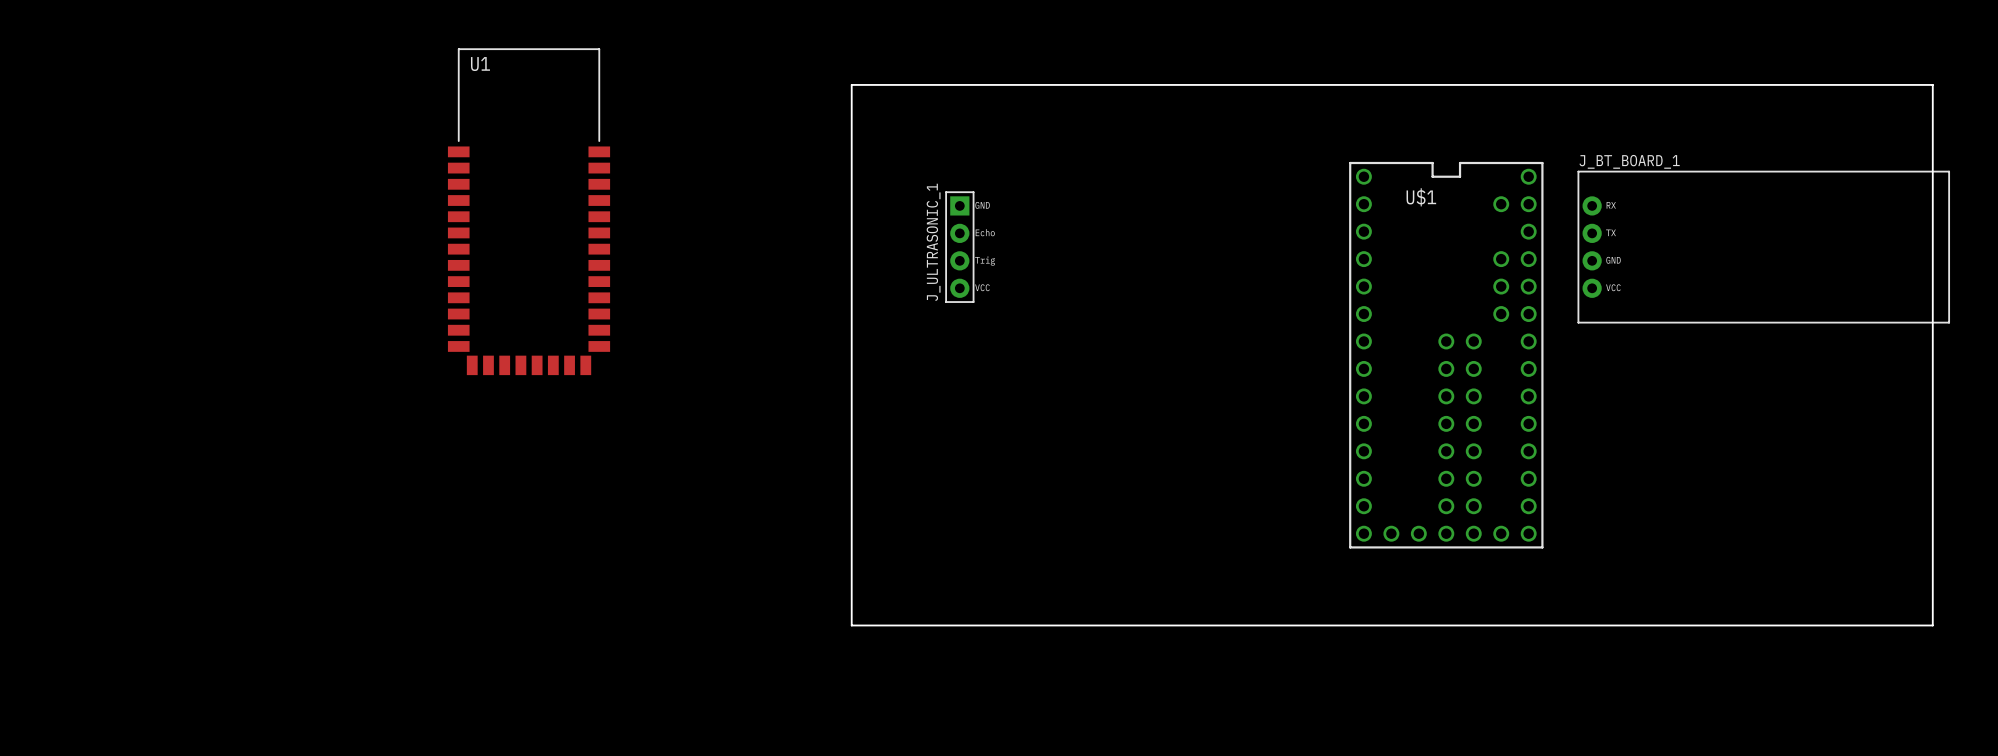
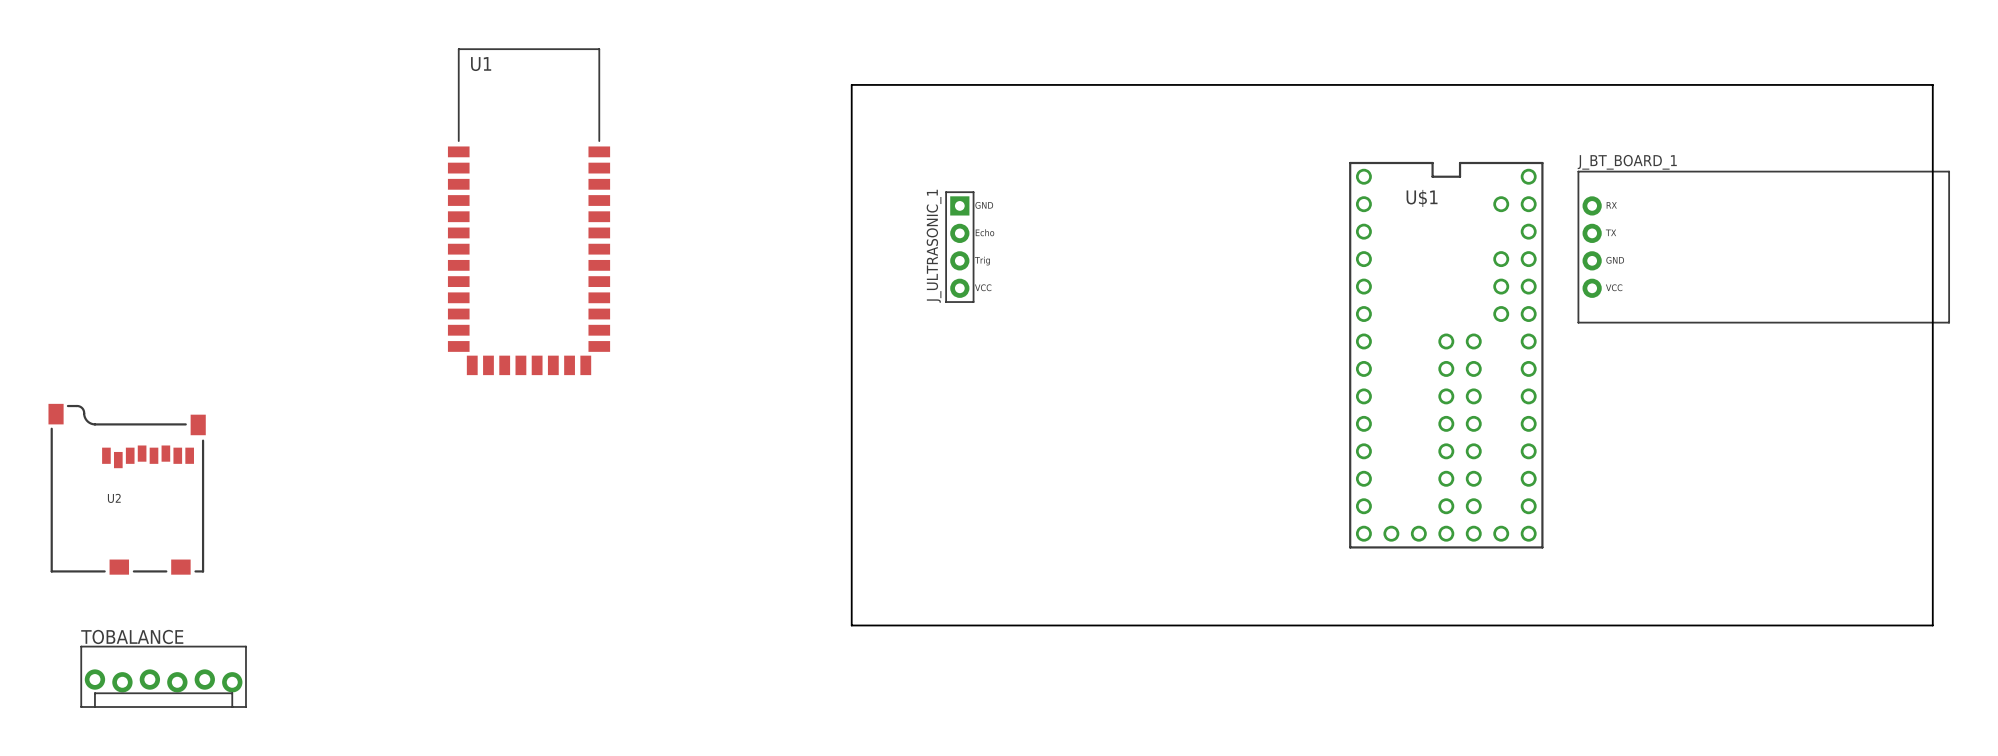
U2: none -> (127, 489)
TOBALANCE: none -> (163, 676)

